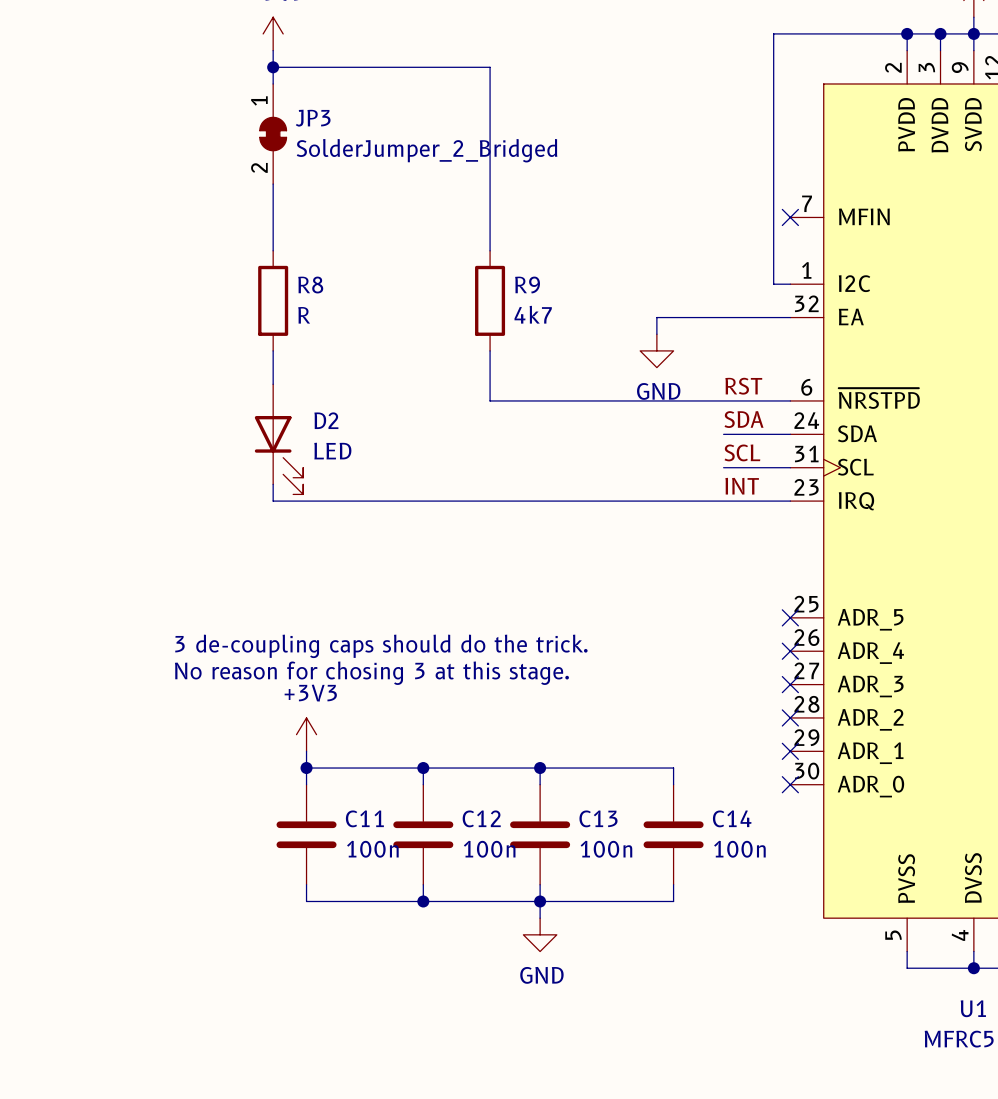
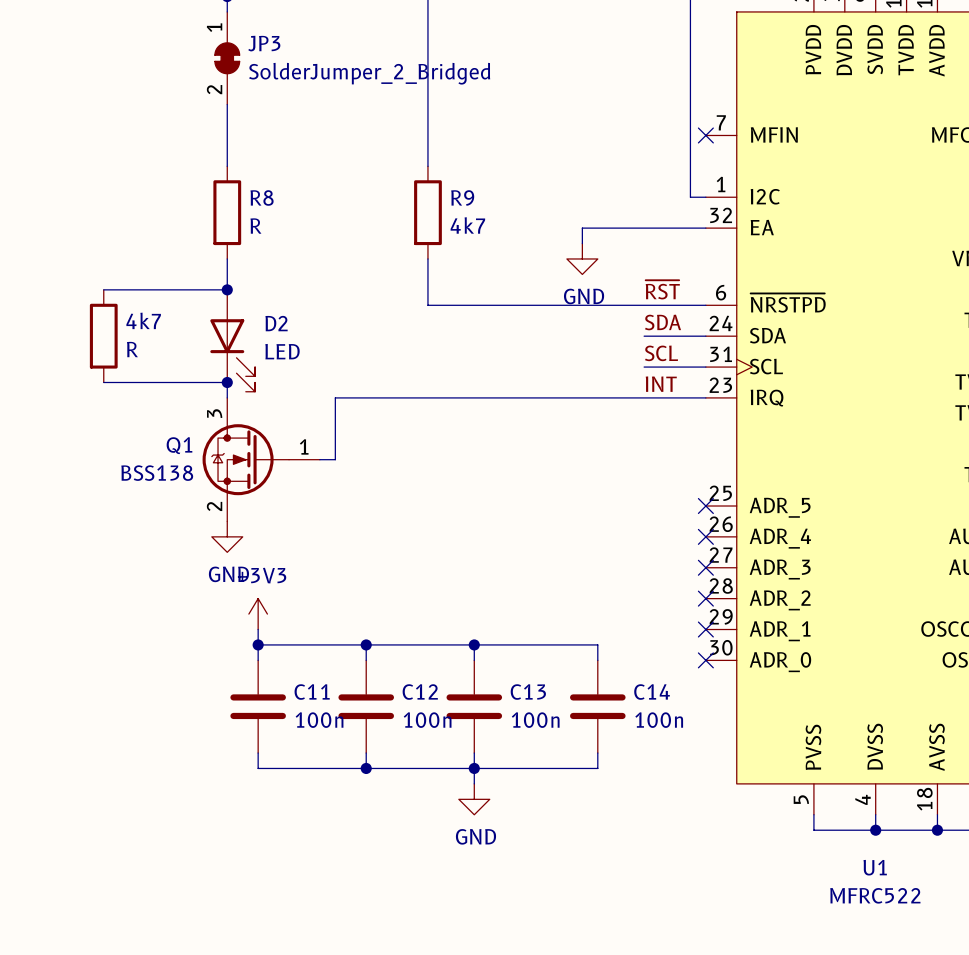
wire: none -> (103, 289) (227, 289)
junction: none -> (227, 289)
label: RST (743, 386) -> ~{RST} (662, 289)
4k7: none -> R (103, 336)
wire: none -> (103, 382) (227, 382)
junction: none -> (227, 382)
wire: (273, 501) (389, 501) -> (319, 459) (335, 459) (335, 397)
Q1: none -> BSS138 (261, 459)
text: 3 de-coupling caps should do the trick. (381, 646) -> none
power symbol: none -> GND (227, 536)
text: No reason for chosing 3 at this stage. (371, 673) -> none

